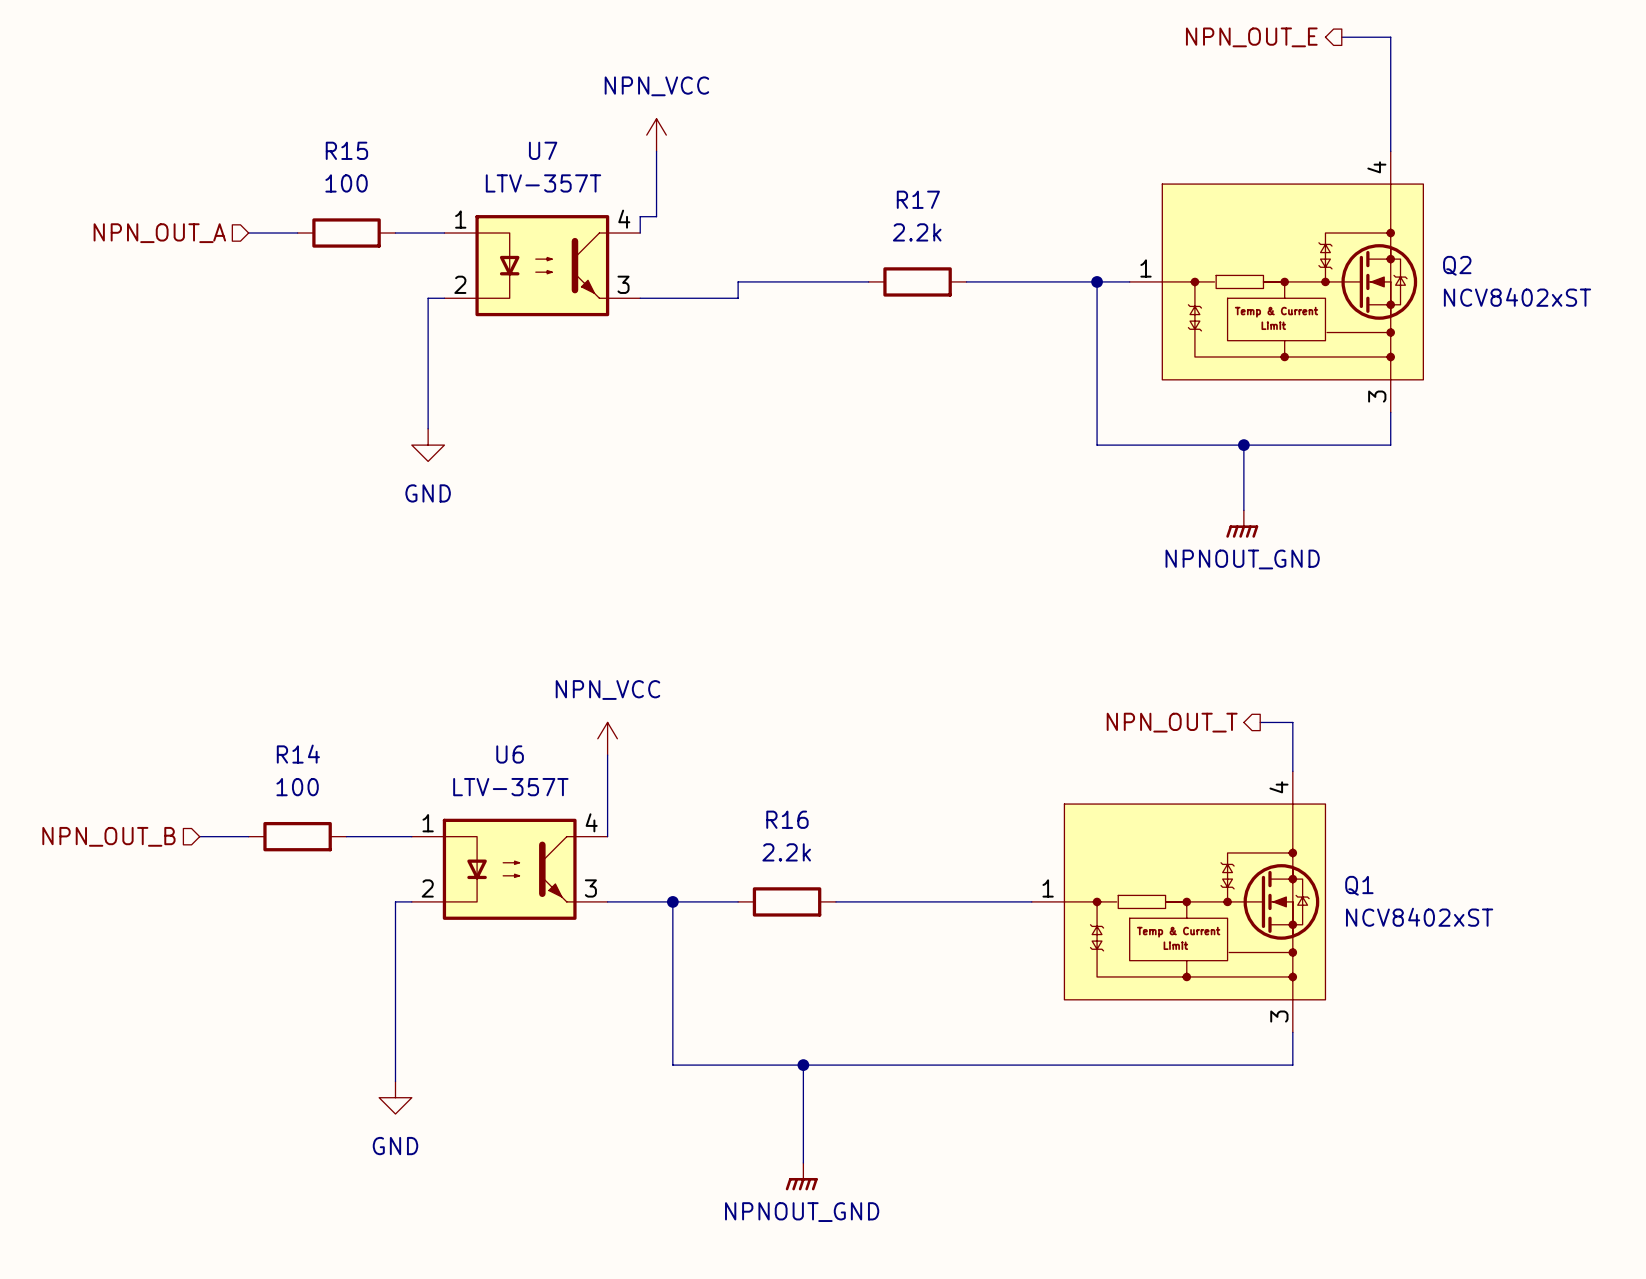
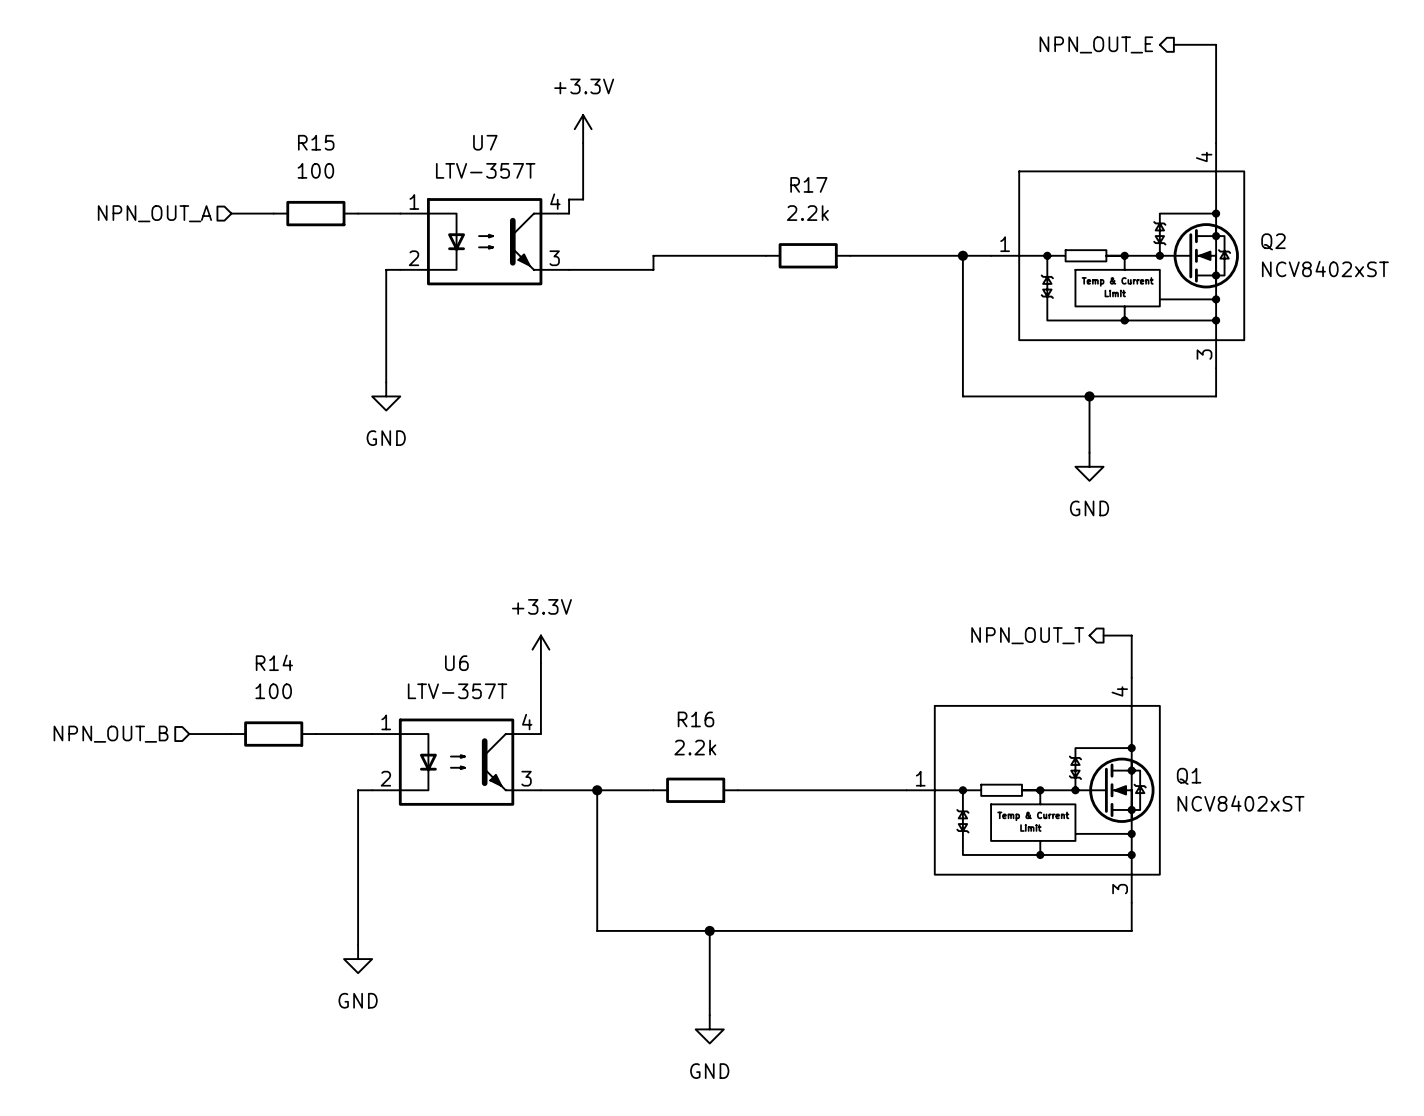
power symbol: NPN_VCC (656, 135) -> +3.3V (583, 129)
power symbol: NPNOUT_GND (1242, 524) -> GND (1089, 466)
power symbol: NPN_VCC (607, 738) -> +3.3V (540, 649)
power symbol: NPNOUT_GND (801, 1176) -> GND (709, 1029)

